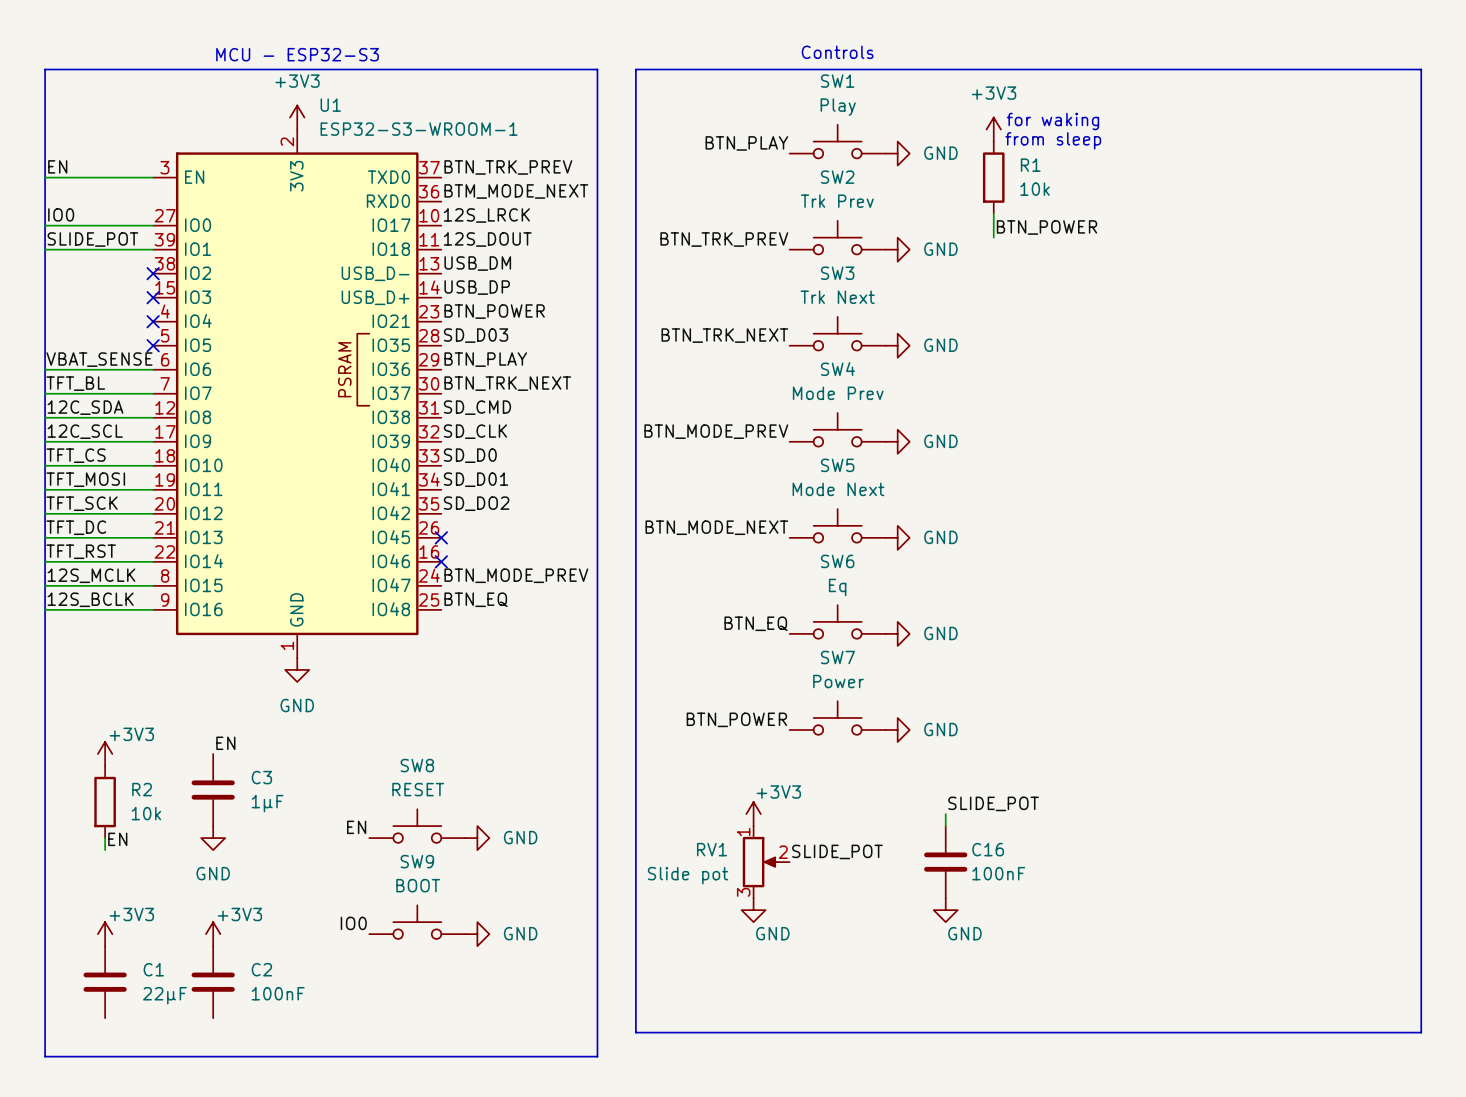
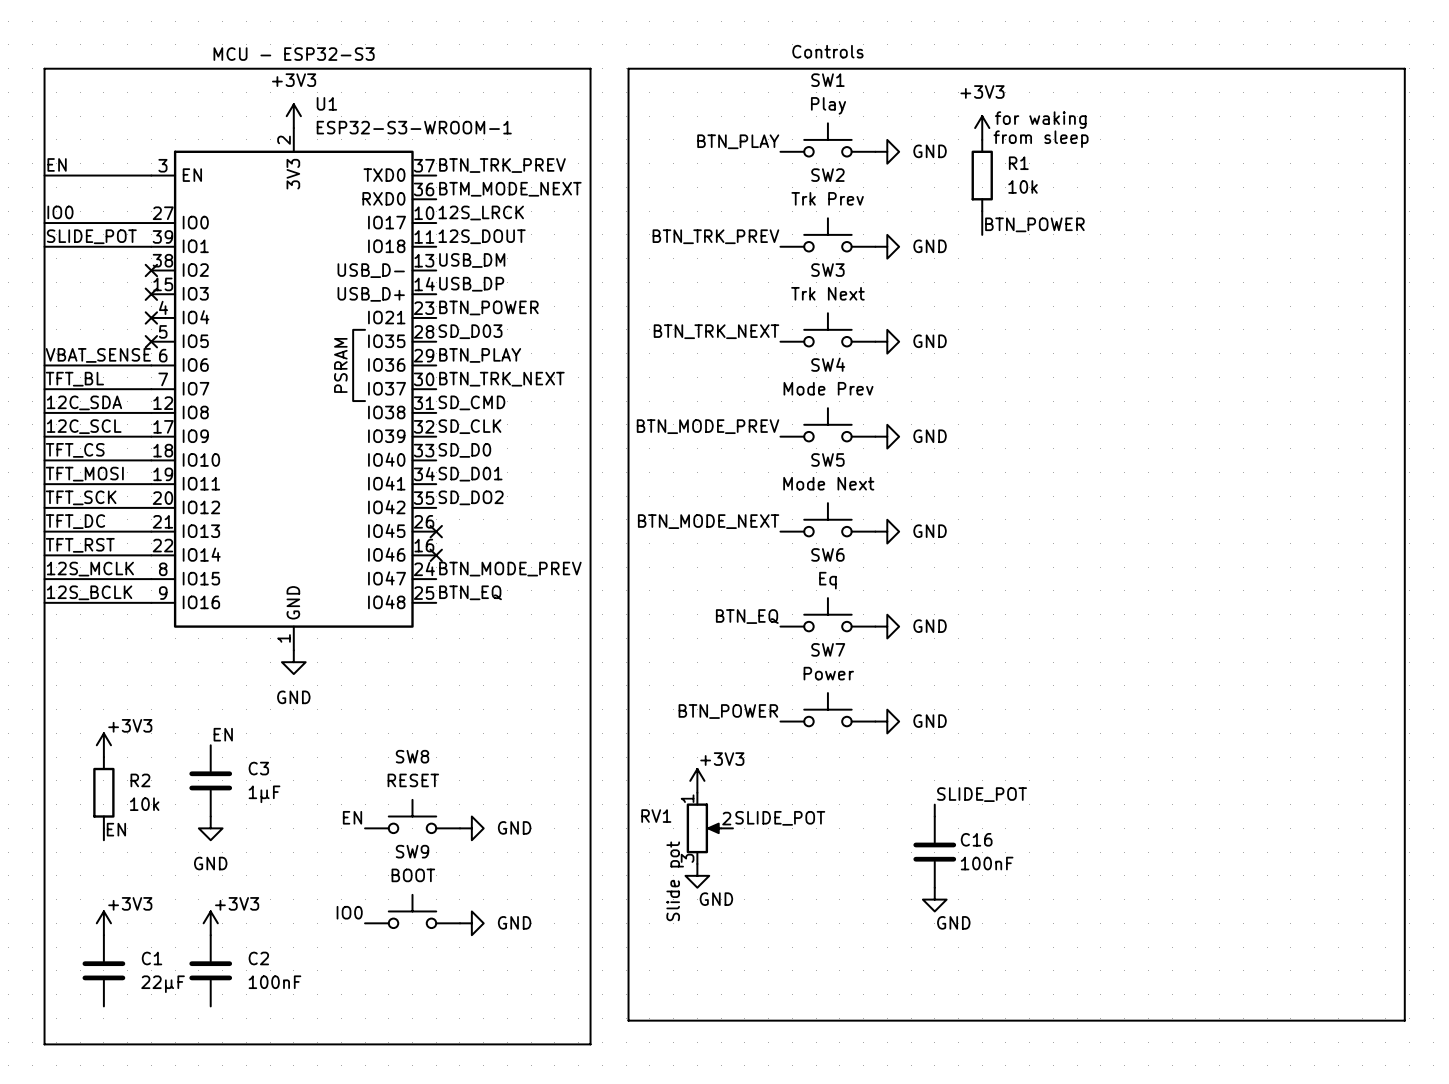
power symbol position: +3V3 (753, 814) -> +3V3 (697, 780)
label position: SLIDE_POT (837, 851) -> SLIDE_POT (780, 818)
RV1 position: (766, 862) -> (709, 828)
RV1 value rotation: 0° (688, 875) -> 90° counterclockwise (675, 881)
power symbol position: GND (753, 910) -> GND (697, 875)

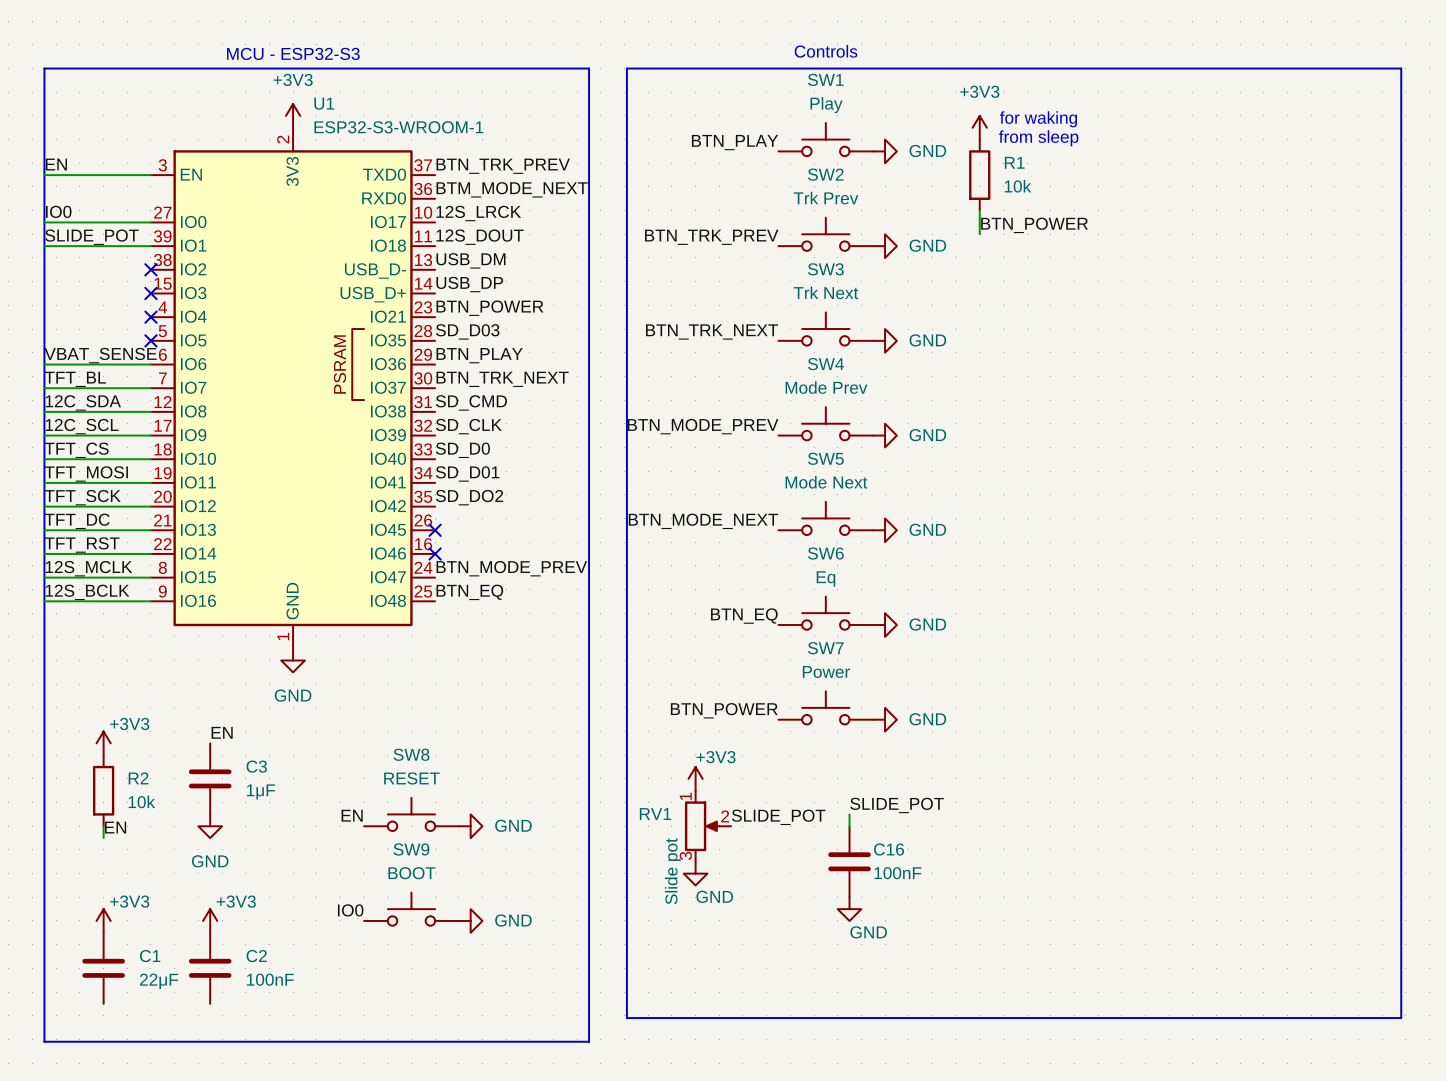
label position: SLIDE_POT (982, 794) -> SLIDE_POT (897, 805)
wire: (934, 804) (934, 816) -> (849, 814) (849, 826)
C16 position: (934, 852) -> (849, 861)
power symbol position: GND (934, 899) -> GND (849, 909)

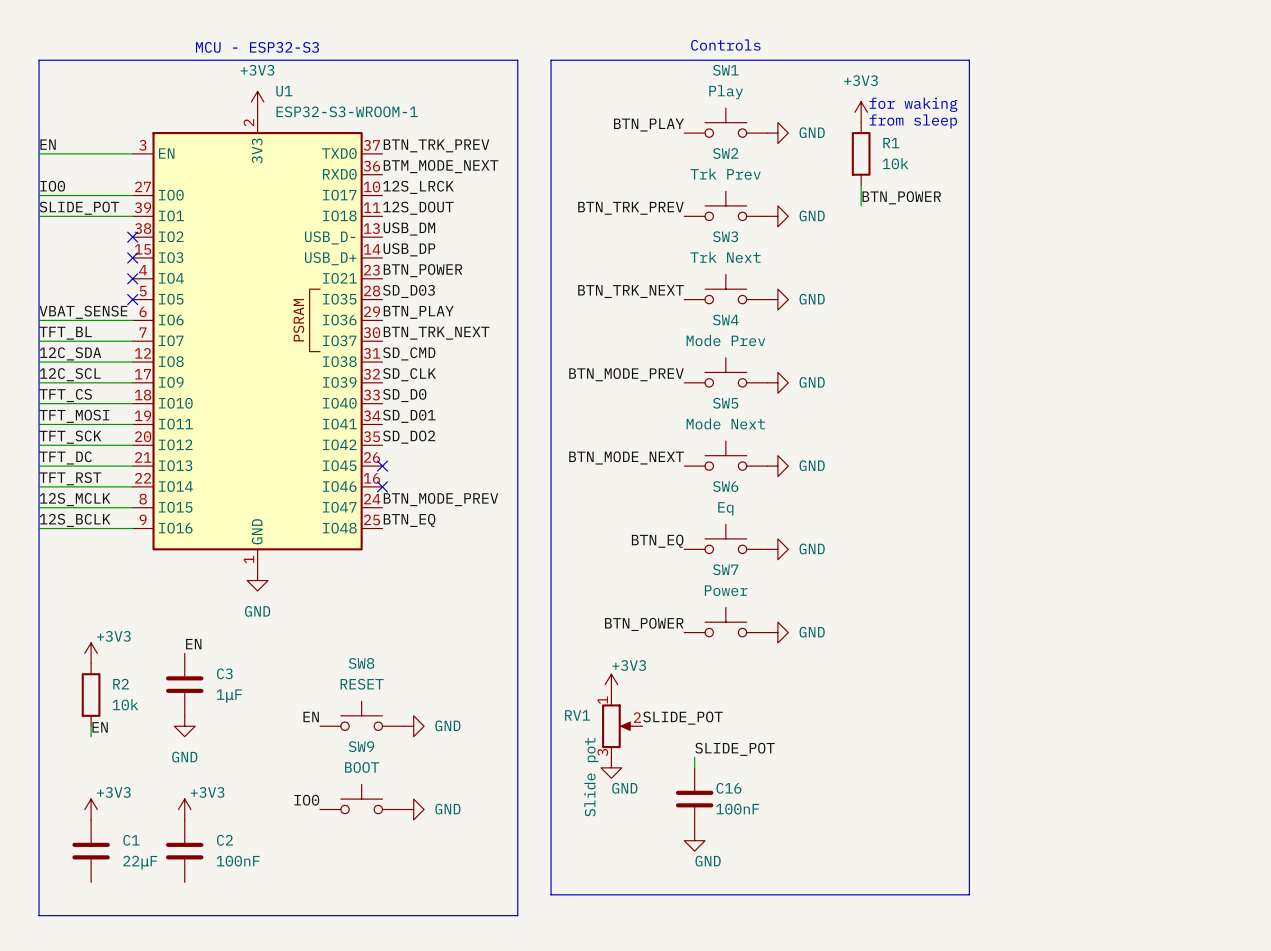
line: (1102, 68) (1401, 68) (1401, 1018) (1102, 1018) -> (969, 60) (969, 894)
label position: SLIDE_POT (897, 805) -> SLIDE_POT (735, 749)
wire: (849, 814) (849, 826) -> (694, 757) (694, 767)
C16 position: (849, 861) -> (694, 799)
power symbol position: GND (849, 909) -> GND (694, 840)

